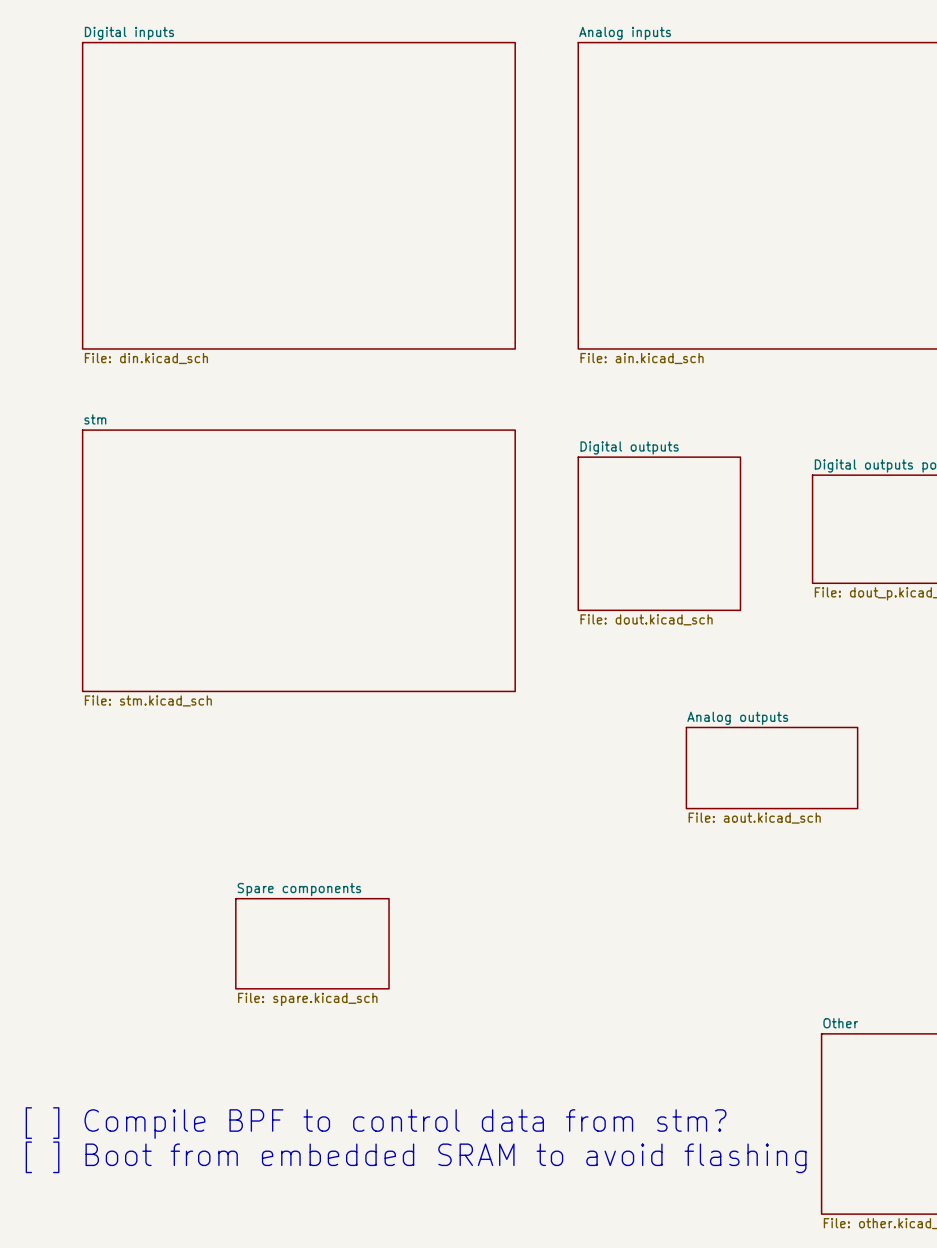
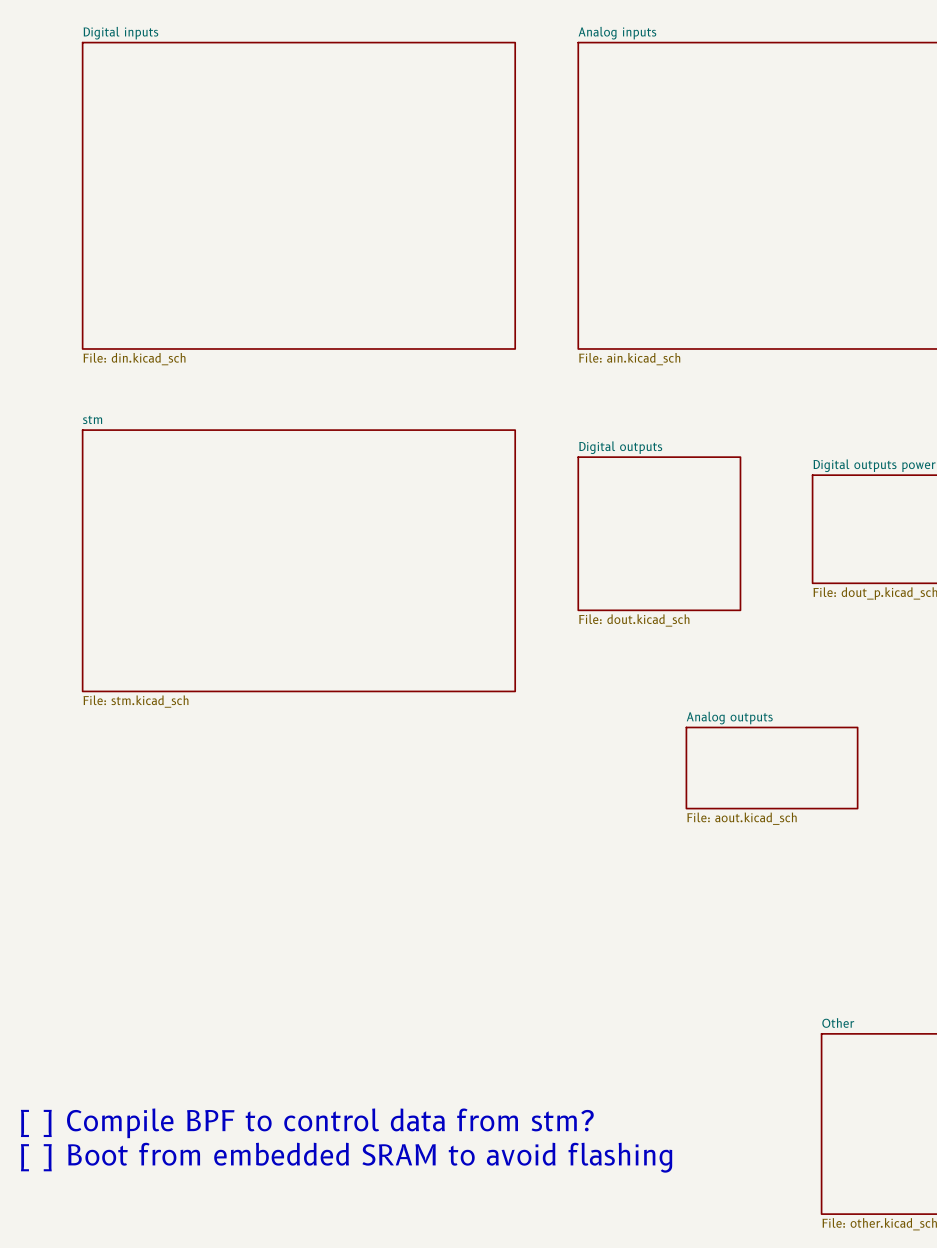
sheet Spare components: File: spare.kicad_sch (312, 943) -> none

